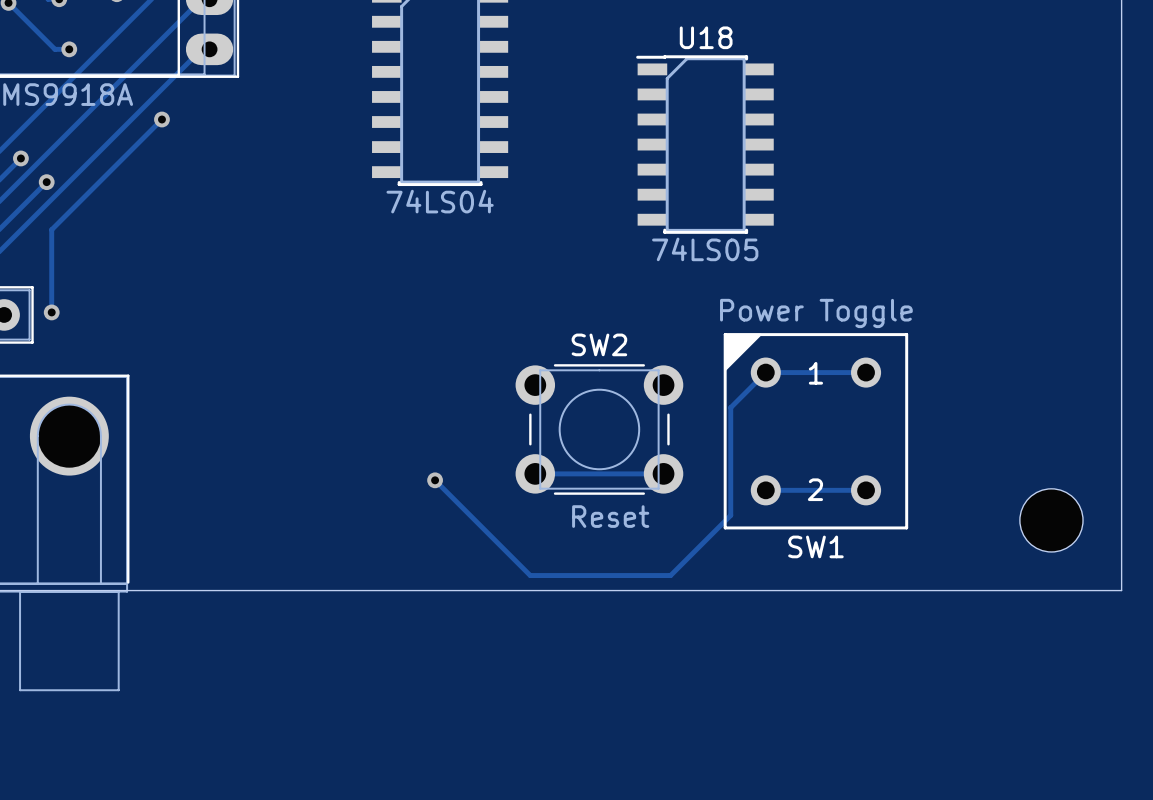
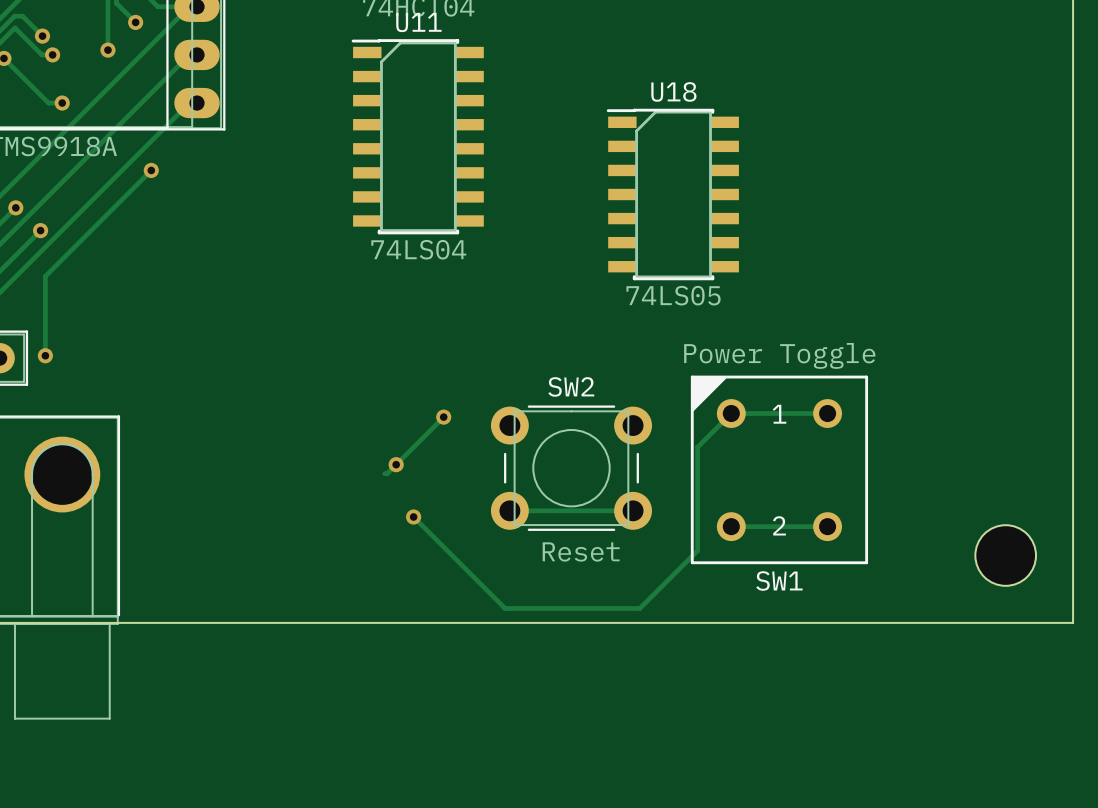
track: none -> (443, 417) (387, 473) (384, 473)
via: none -> (443, 417)
via: none -> (396, 464)

